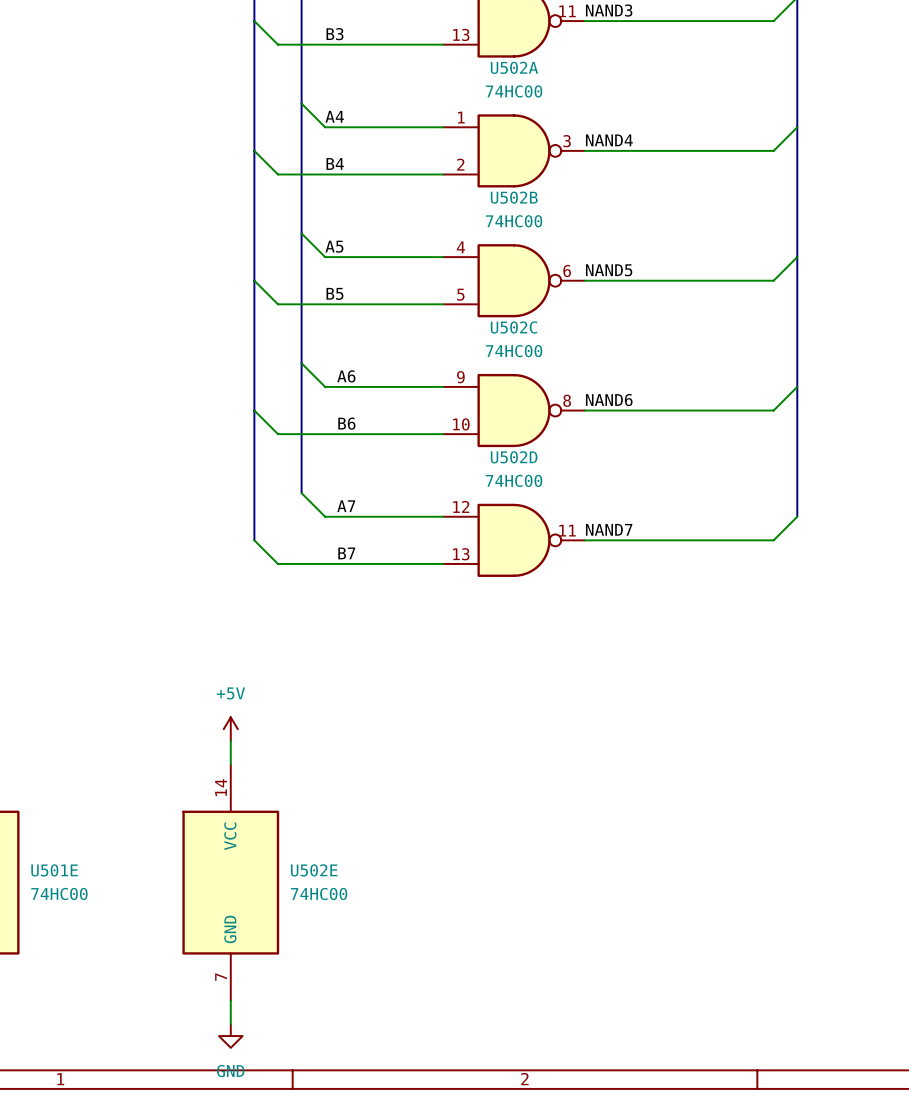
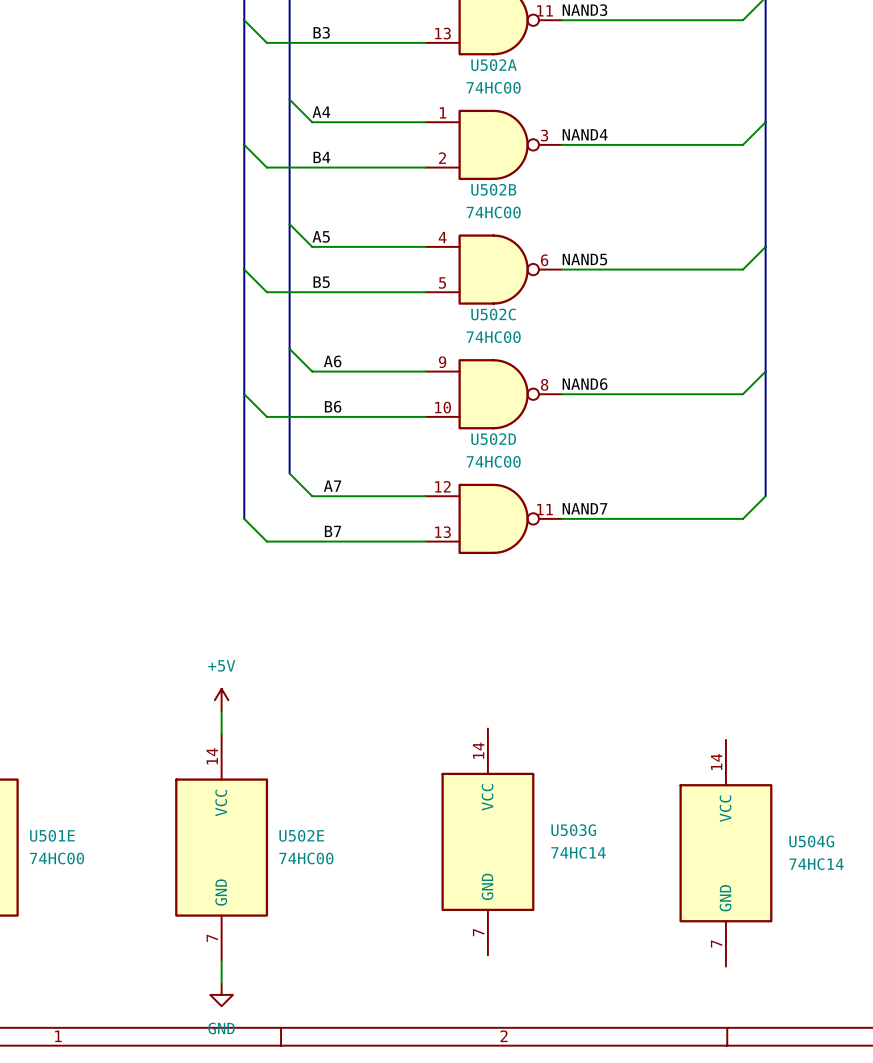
U503G: none -> 74HC14 (487, 841)
U504G: none -> 74HC14 (725, 853)

